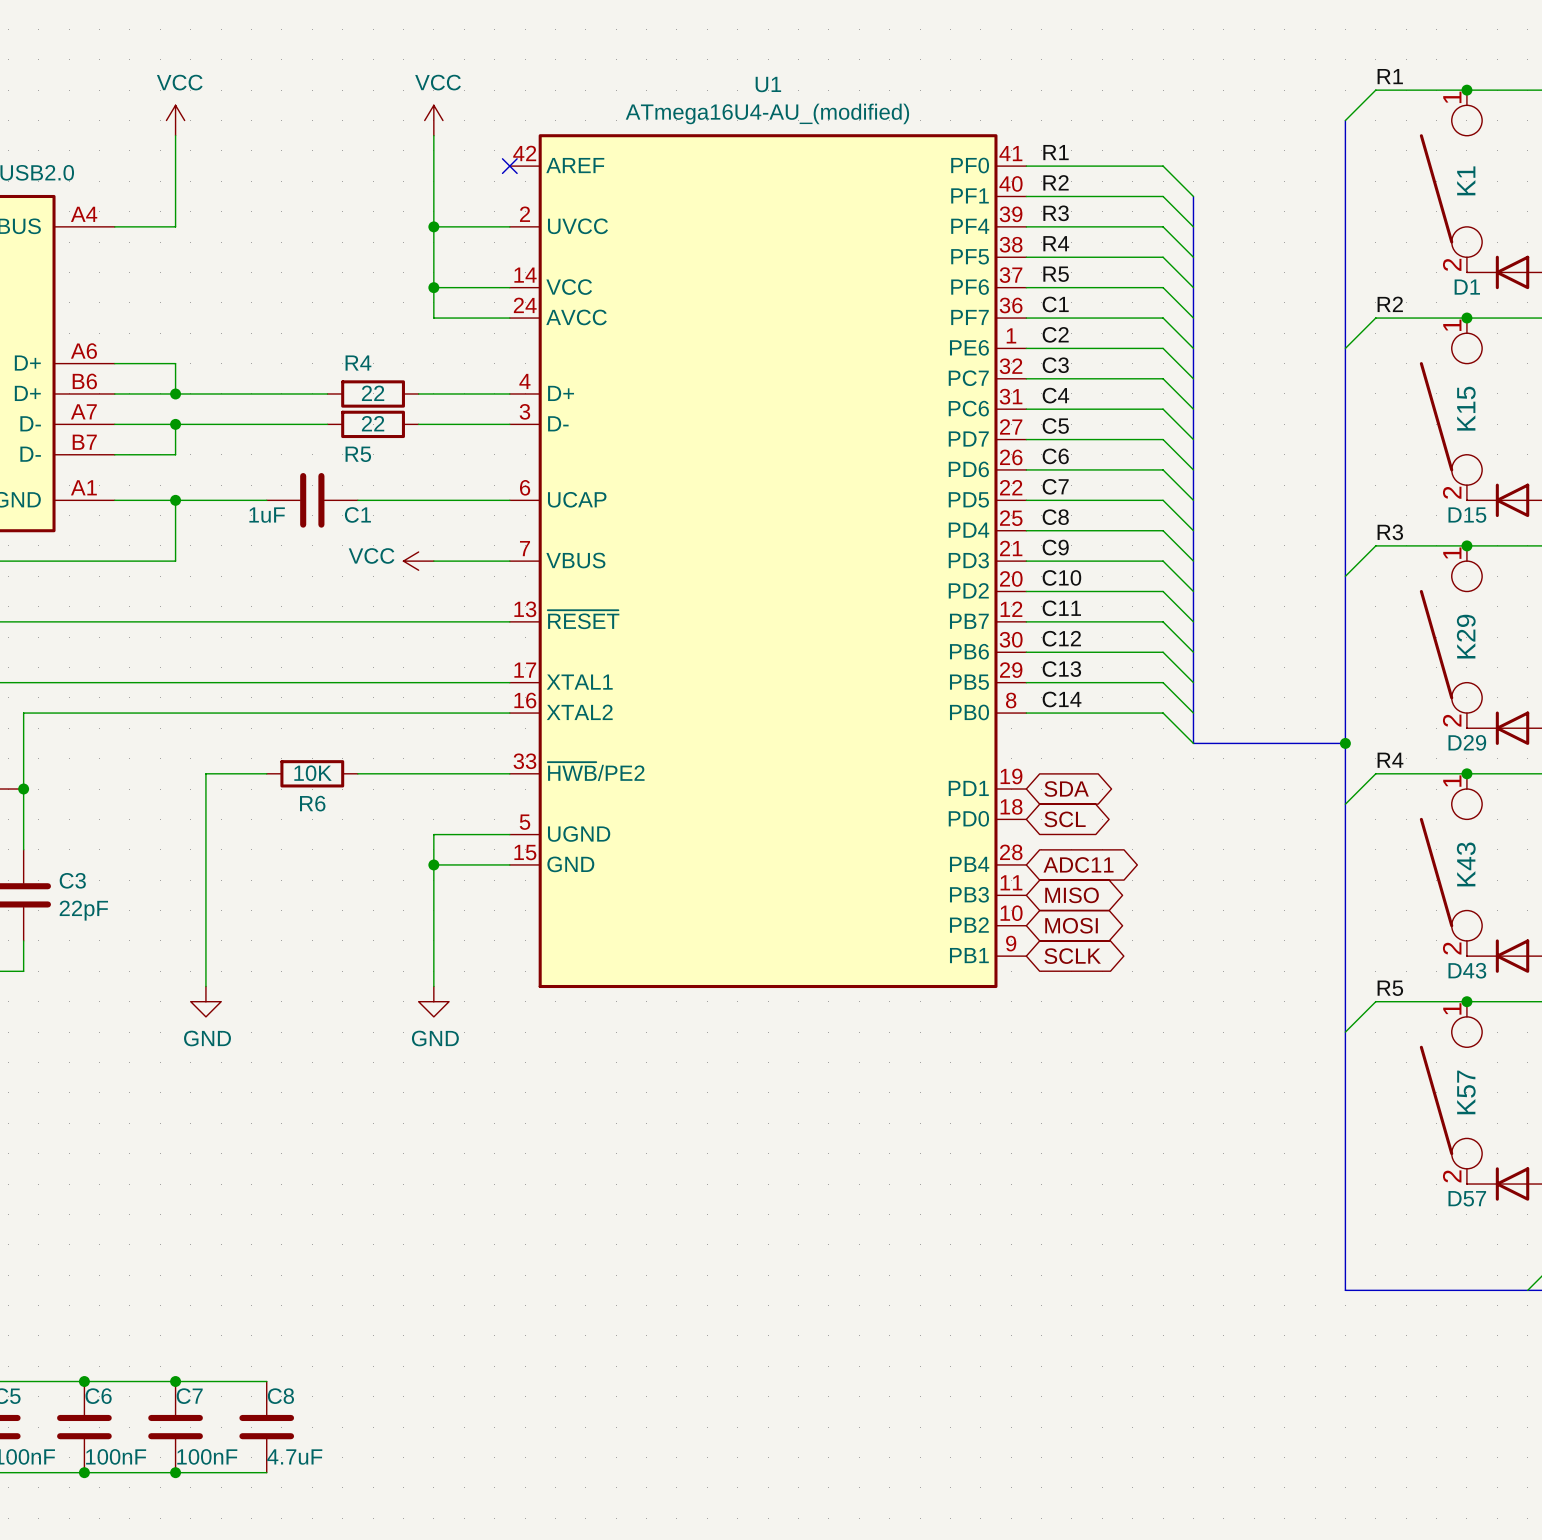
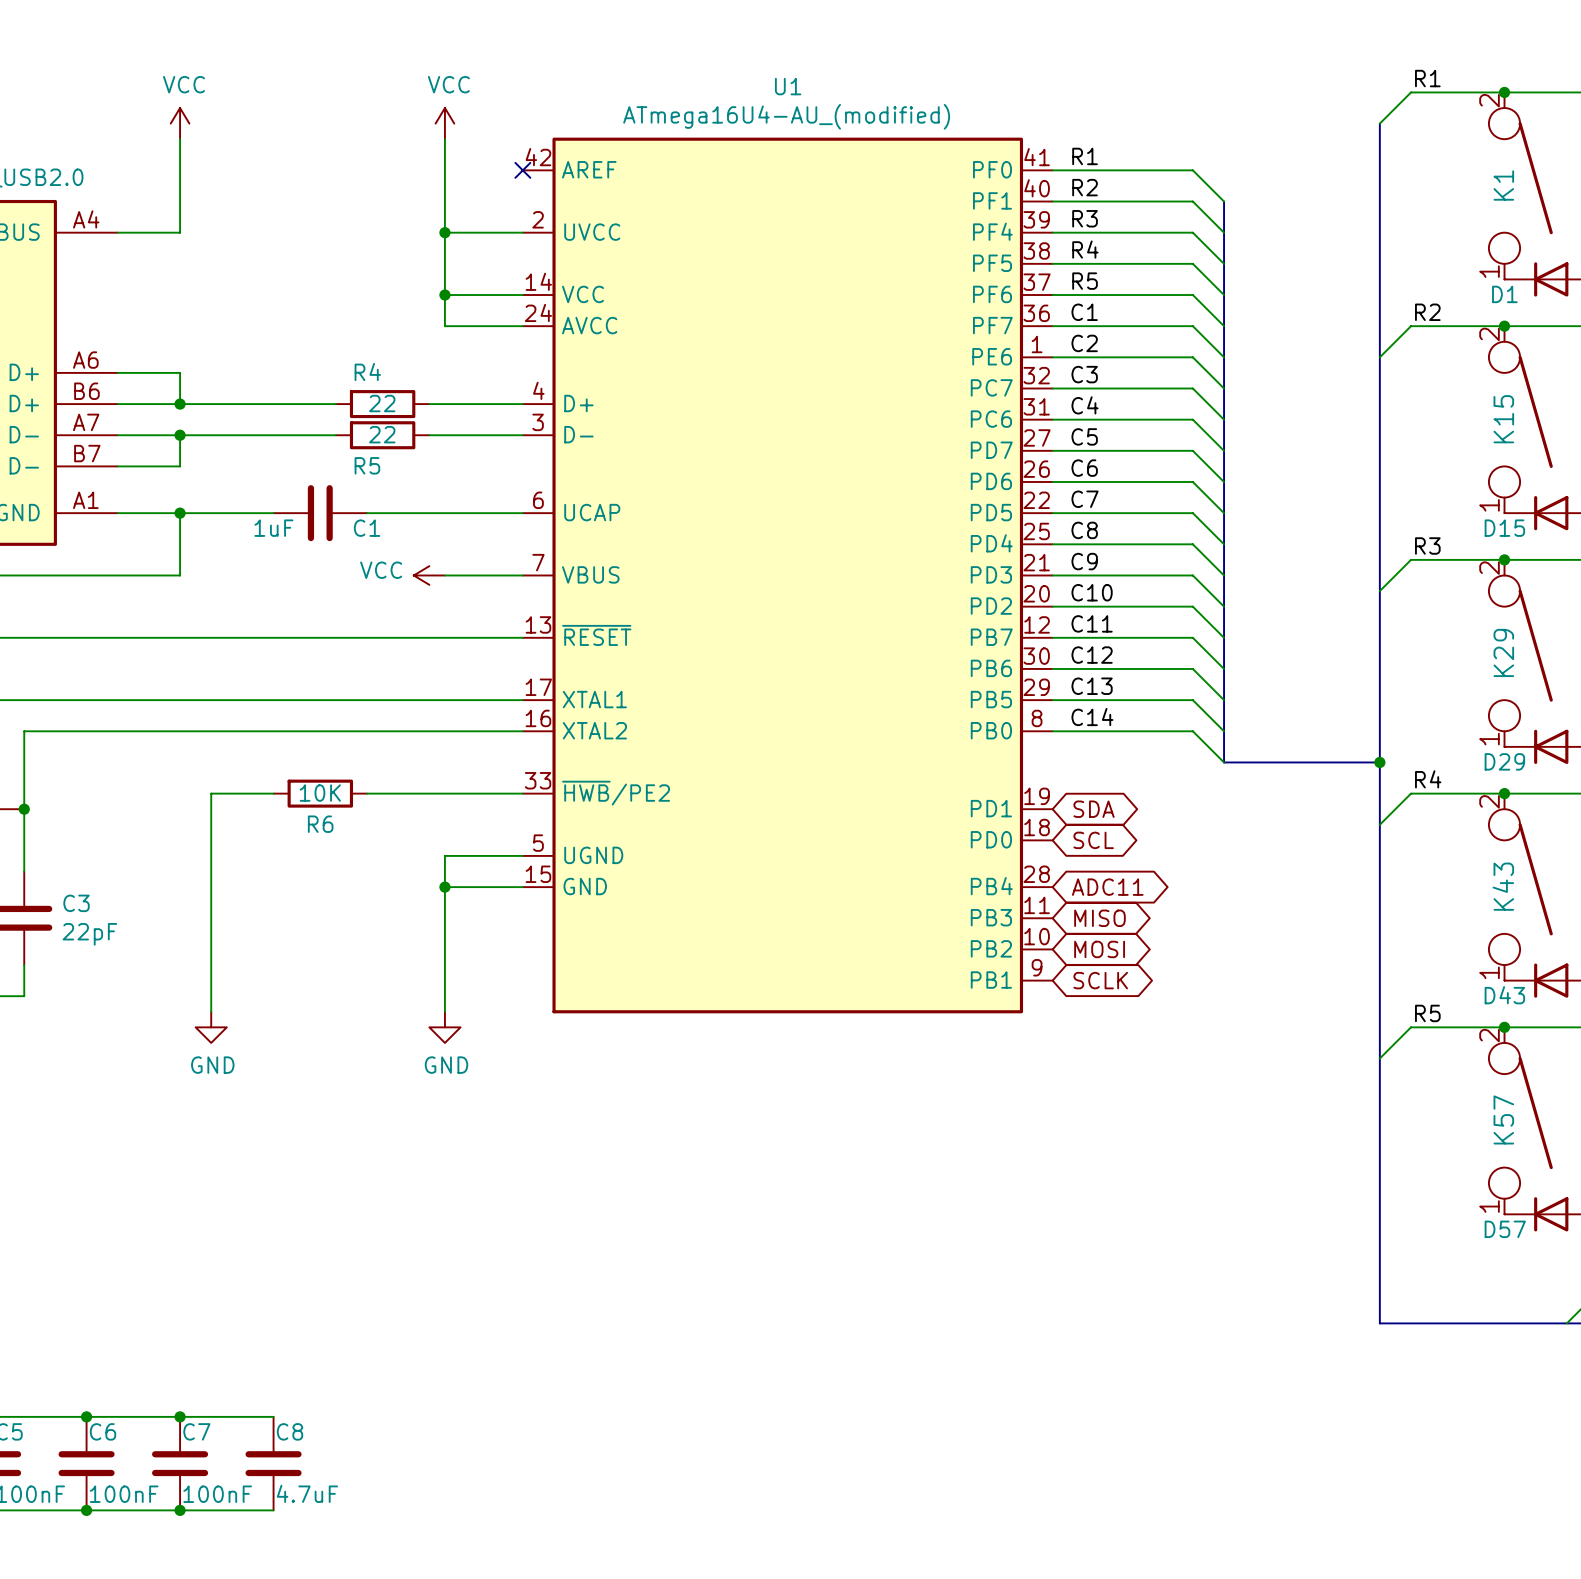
K1 rotation: 0° (1450, 181) -> 180° (1520, 185)
K15 rotation: 0° (1450, 409) -> 180° (1520, 419)
K29 rotation: 0° (1450, 637) -> 180° (1520, 653)
K43 rotation: 0° (1450, 864) -> 180° (1520, 887)
K57 rotation: 0° (1450, 1092) -> 180° (1520, 1120)

